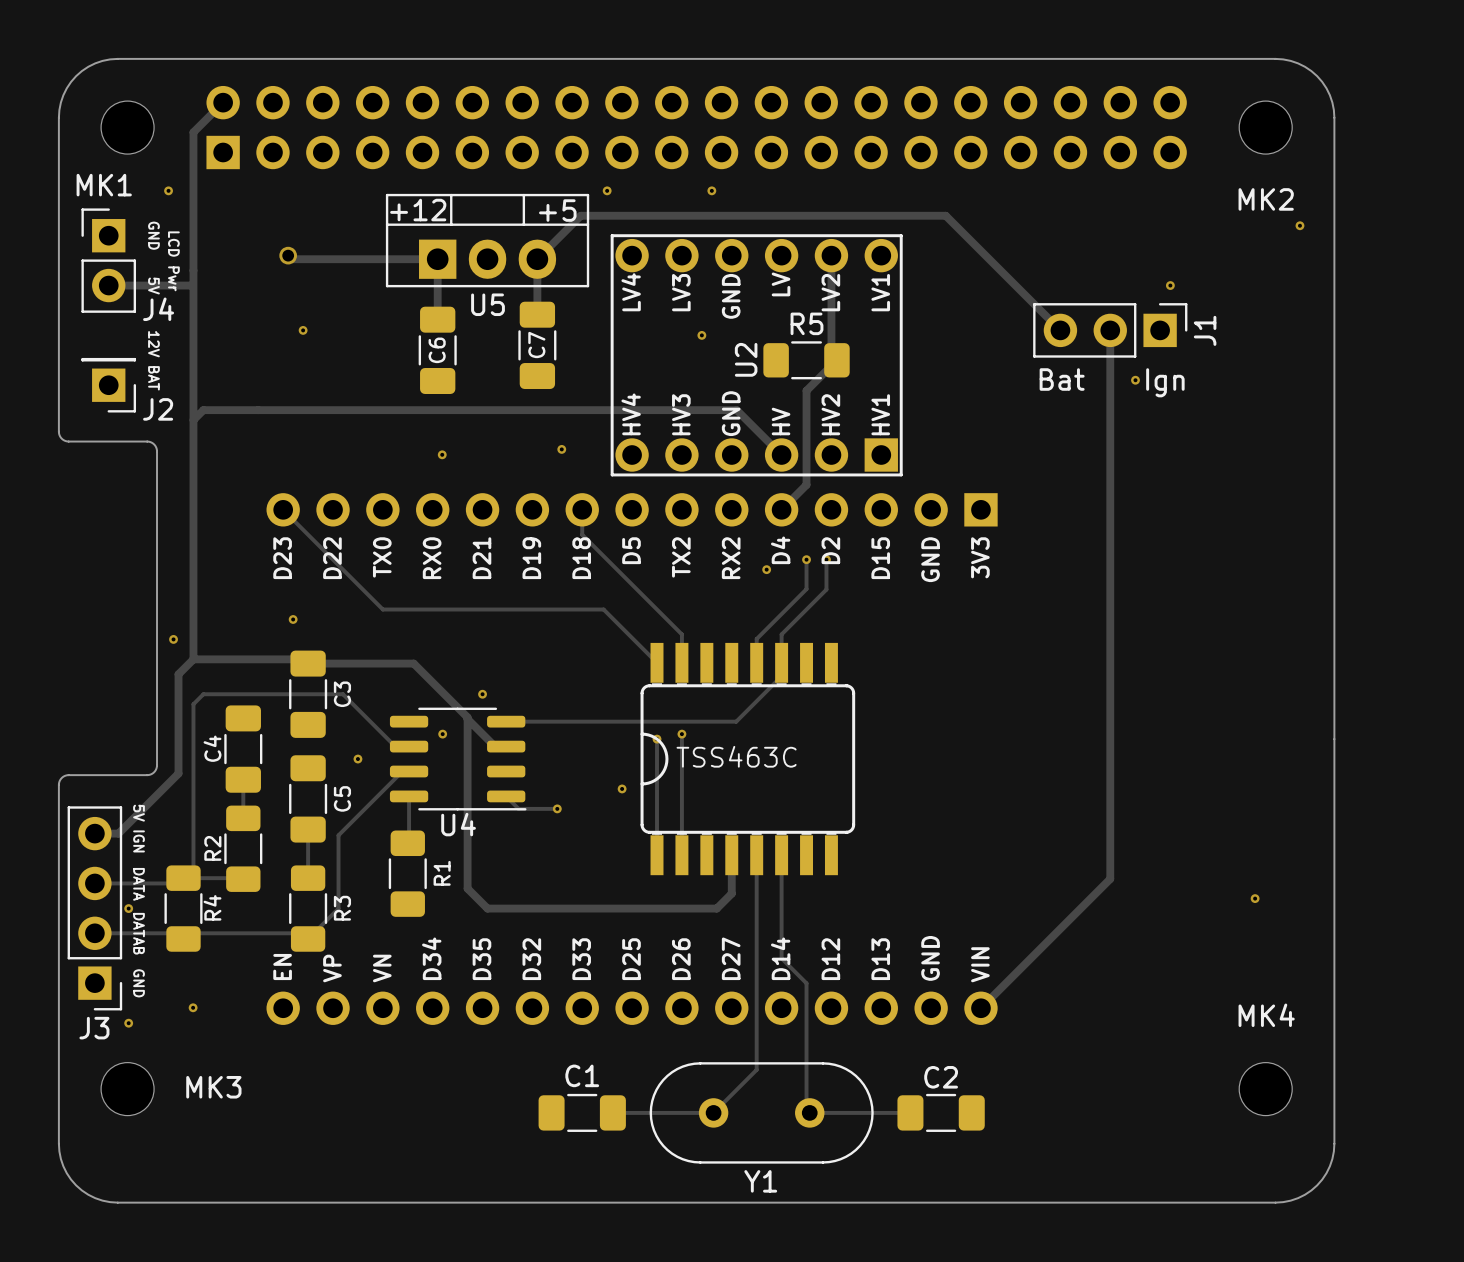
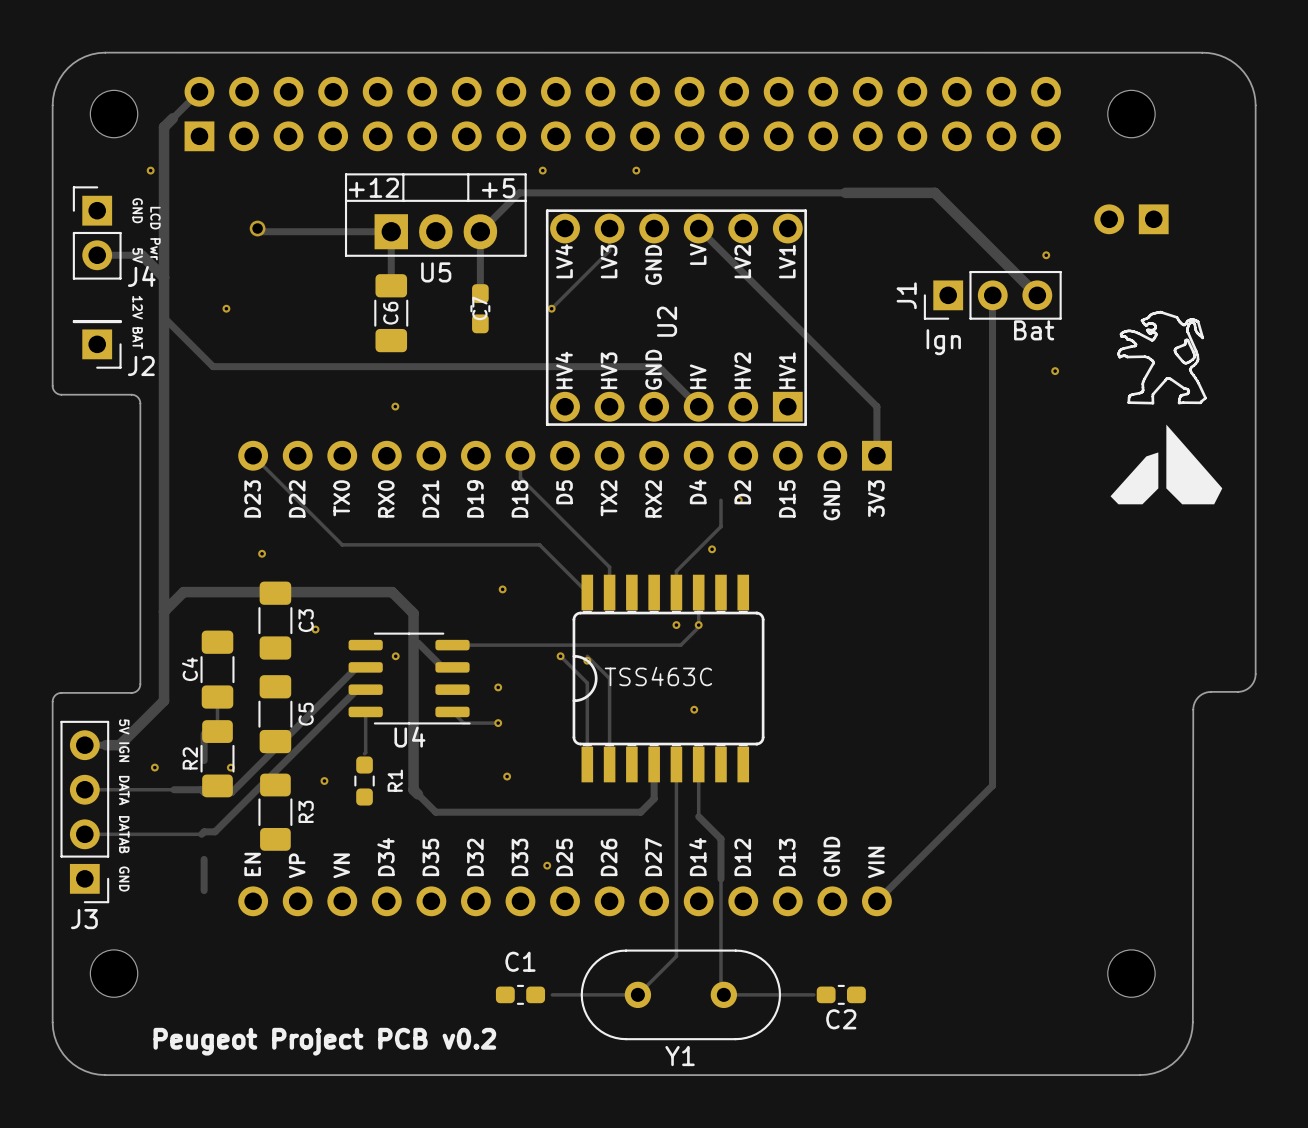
board edge: (117, 58) (1275, 58) (1298, 63) (1317, 76) (1329, 95) (1334, 117) (1334, 1143) -> (105, 52) (1202, 52) (1219, 55) (1239, 67) (1250, 82) (1255, 105) (1255, 674) (1253, 682) (1246, 689) (1240, 691) (1206, 692) (1198, 697) (1193, 707) (1192, 1022)
track: (193, 132) (193, 659) -> (172, 118) (164, 127) (164, 700) (119, 745) (105, 745)
MK1 name: MK1 (104, 185) -> none
MK2 name: MK2 (1266, 199) -> none
track: (945, 215) (1060, 330) -> (845, 192) (934, 192) (1037, 295)
via: (1299, 225) -> none
part: none -> (1131, 219)
track: none -> (609, 228) (609, 250) (551, 308)
track: none -> (698, 228) (876, 406) (876, 455)
track: (831, 255) (831, 354) -> none
track: (158, 285) (192, 285) -> (141, 255) (164, 277)
C7 footprint: [518, 301, 557, 390] -> [470, 284, 491, 334]
via position: (303, 330) -> (226, 308)
J1 rotation: 0° (1110, 330) -> 180° (992, 295)
via: (701, 335) -> none
via: none -> (551, 308)
drawing: none -> [1110, 310, 1223, 505]
R5: (806, 360) -> none
track: (836, 360) (806, 390) (806, 484) (781, 509) -> none
text position: Bat (1062, 379) -> Bat (1034, 330)
via position: (1135, 380) -> (1055, 371)
text position: Ign (1165, 382) -> Ign (943, 342)
track: (238, 410) (203, 410) (193, 420) -> (213, 366) (164, 317)
via: (561, 449) -> none
via: (806, 559) -> none
track: (826, 559) (826, 589) (781, 634) (781, 676) (736, 721) -> (698, 604) (698, 627) (680, 645) (658, 645)
via: (766, 569) -> none
via: none -> (712, 549)
via: (173, 639) -> none
track: (193, 659) (303, 659) (308, 663) (413, 663) (467, 717) (467, 888) -> (164, 611) (183, 592) (392, 592) (413, 613) (413, 789) (418, 794)
track: (193, 659) (178, 674) (178, 773) (118, 833) -> none
via: none -> (502, 589)
via: (482, 694) -> none
via: none -> (676, 625)
via: none -> (698, 625)
via: none -> (560, 656)
track: (681, 734) (681, 759) -> (587, 656) (609, 678)
via: (681, 734) -> none
track: (657, 739) (657, 764) -> (560, 656) (587, 682)
track: (395, 746) (342, 694) (203, 694) (193, 704) (193, 868) (183, 878) (243, 879) -> none
track: none -> (356, 667) (231, 792) (173, 789)
via position: (357, 759) -> (315, 629)
via: none -> (498, 687)
track: (402, 771) (338, 835) (338, 908) (308, 938) -> (359, 689) (357, 689) (215, 831) (204, 831) (201, 834)
via: (622, 788) -> none
via: none -> (694, 709)
track: none -> (204, 733) (204, 760)
track: (308, 829) (308, 878) -> none
R1 footprint: [388, 830, 427, 917] -> [354, 756, 375, 806]
via: none -> (230, 767)
via: none -> (507, 776)
via: none -> (324, 781)
via: (1255, 898) -> none
via position: (128, 908) -> (154, 767)
R4: (183, 908) -> none
track: (781, 913) (781, 958) (806, 983) -> (698, 816) (720, 838) (720, 879)
track: (225, 933) (302, 933) -> none
track: none -> (204, 859) (204, 890)
via: none -> (547, 865)
via: (193, 1007) -> none
MK4 name: MK4 (1266, 1015) -> none
via: (128, 1023) -> none
C2 name position: C2 (941, 1077) -> C2 (841, 1019)
MK3 name: MK3 (213, 1087) -> none
C1 footprint: [538, 1093, 626, 1132] -> [495, 984, 546, 1005]
C2 footprint: [897, 1093, 985, 1132] -> [816, 984, 866, 1005]
text: none -> Peugeot Project PCB v0.2 (324, 1041)

